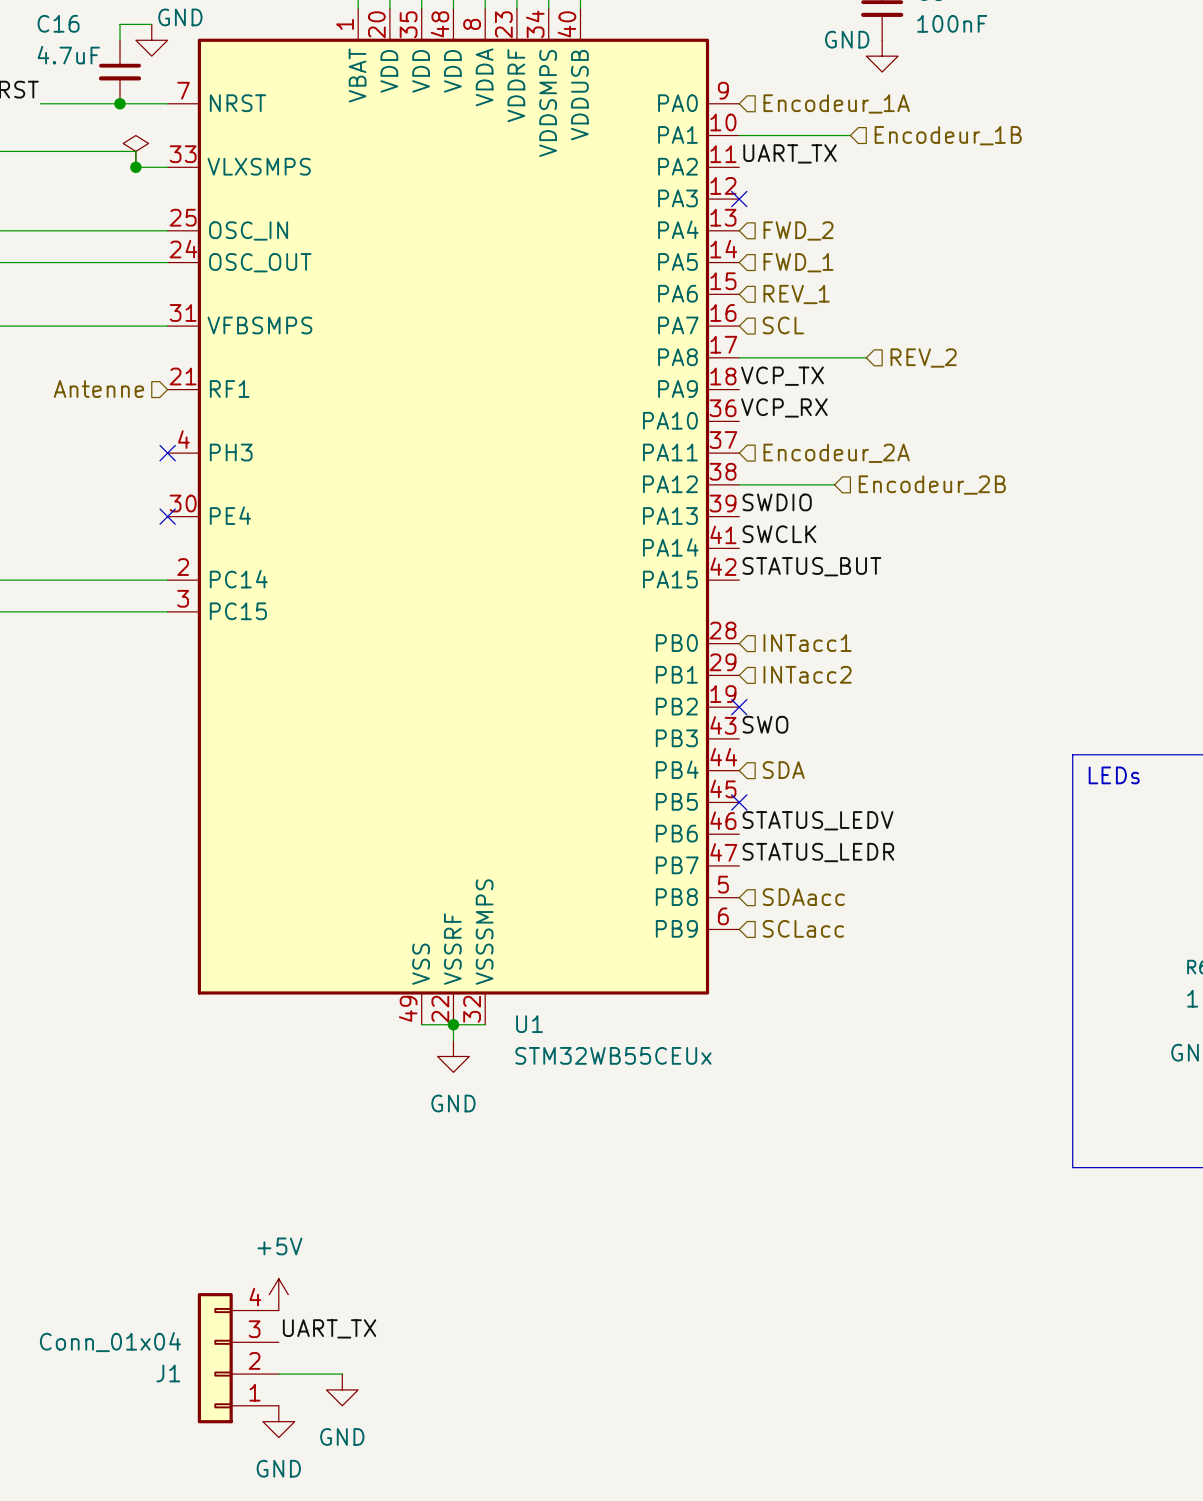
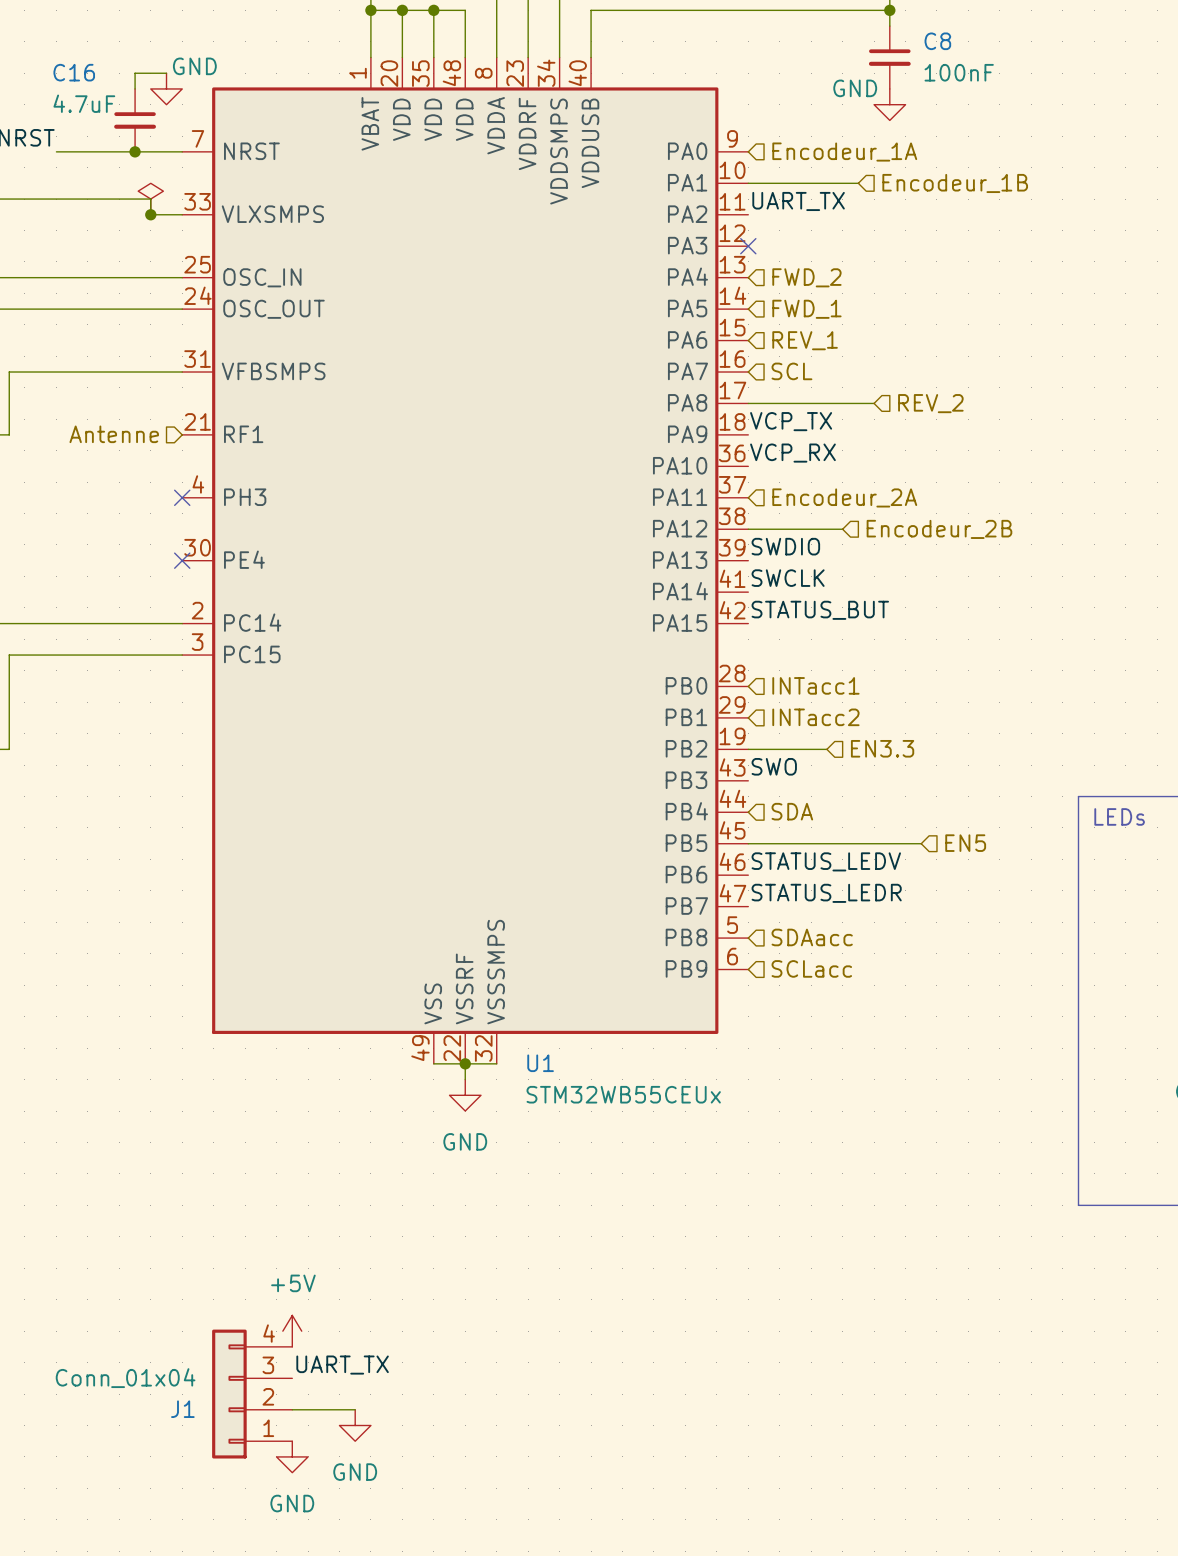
hierarchical label: none -> EN3.3 (882, 748)
wire: none -> (748, 749) (826, 749)
no-connect mark: (739, 707) -> none
hierarchical label: none -> EN5 (965, 843)
wire: none -> (748, 843) (921, 843)
no-connect mark: (739, 802) -> none

